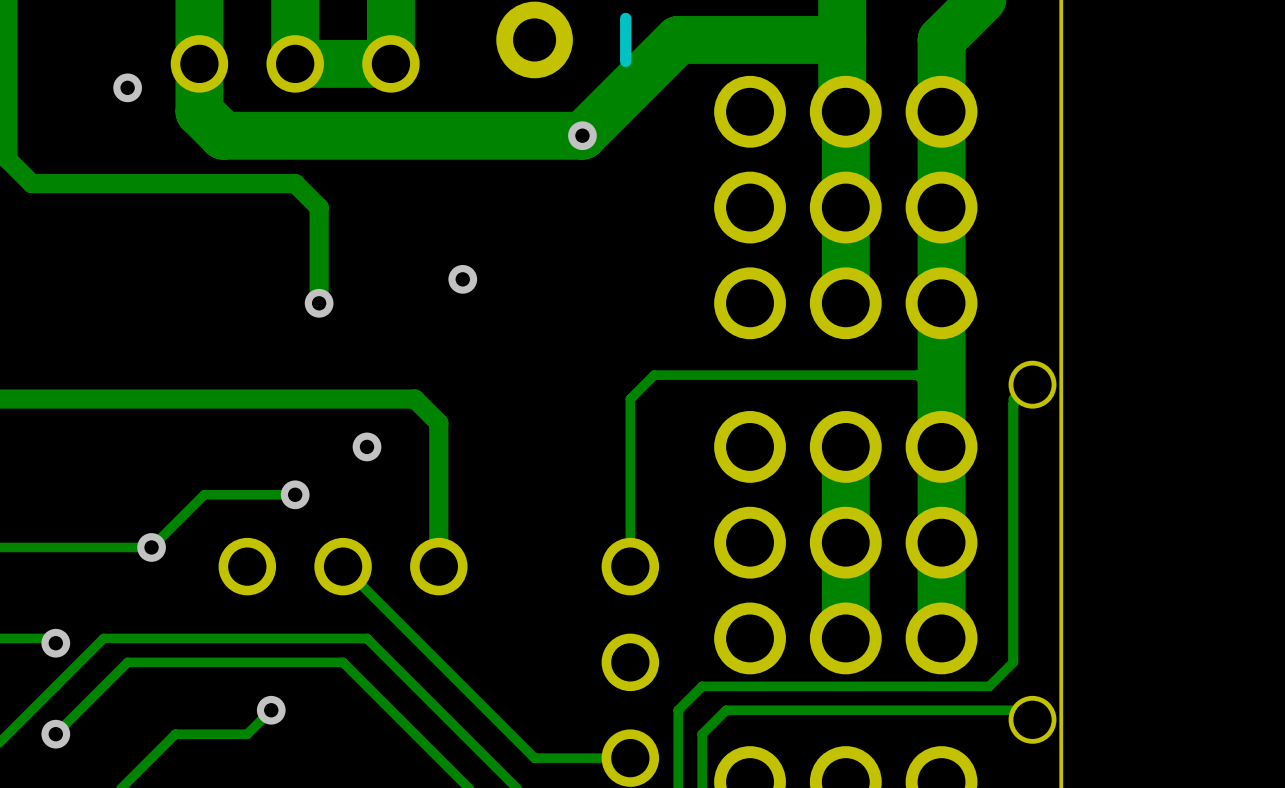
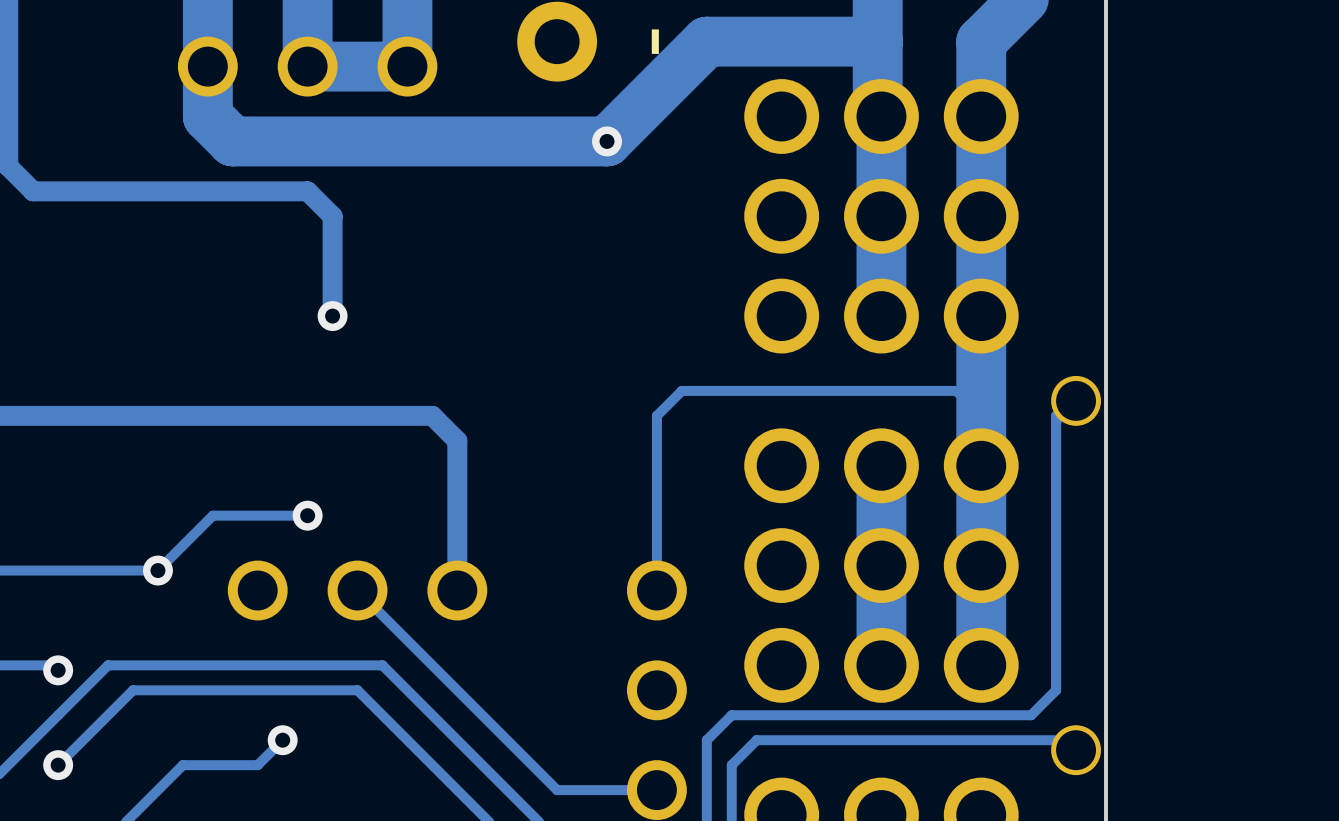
via: (127, 87) -> none
via: (462, 279) -> none
via: (367, 446) -> none

